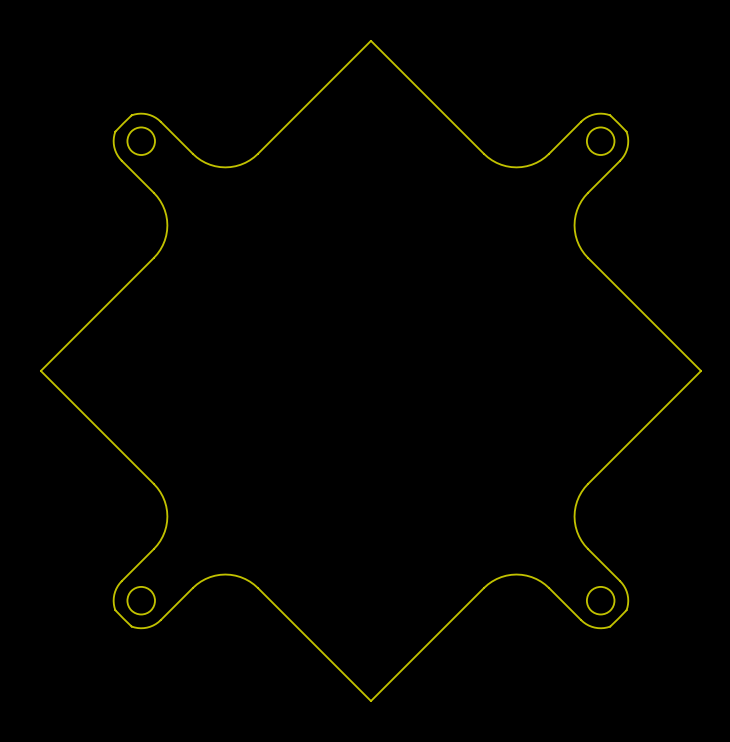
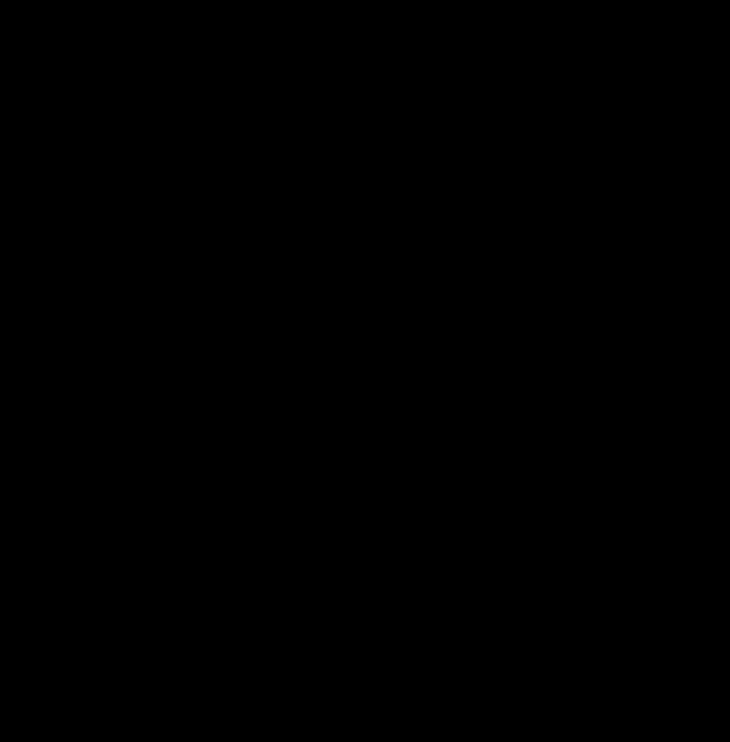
board edge: (370, 40) (484, 153) (501, 164) (516, 167) (536, 162) (549, 153) (583, 119) (591, 115) (601, 113) (610, 115) (618, 123) (626, 131) (628, 140) (626, 150) (622, 158) (587, 192) (579, 205) (574, 225) (577, 240) (587, 257) (701, 370) (587, 484) (577, 501) (574, 516) (579, 536) (587, 549) (622, 583) (626, 591) (628, 601) (626, 610) (618, 618) (610, 626) (601, 628) (591, 626) (583, 622) (549, 587) (536, 579) (516, 574) (501, 577) (484, 587) (370, 701) (257, 587) (240, 577) (225, 574) (205, 579) (192, 587) (158, 622) (150, 626) (140, 628) (131, 626) (123, 618) (115, 610) (113, 601) (115, 591) (119, 583) (153, 549) (162, 536) (167, 516) (164, 501) (153, 484) (40, 370) (153, 257) (164, 240) (167, 220) (162, 205) (153, 192) (119, 158) (115, 150) (113, 140) (115, 131) (123, 123) (131, 115) (140, 113) (150, 115) (158, 119) (192, 153) (205, 162) (220, 167) (240, 164) (257, 153) (370, 40) -> none
round board edge: [126, 126, 156, 156] -> none
round board edge: [585, 126, 616, 156] -> none
round board edge: [126, 585, 156, 616] -> none
round board edge: [585, 585, 616, 616] -> none

